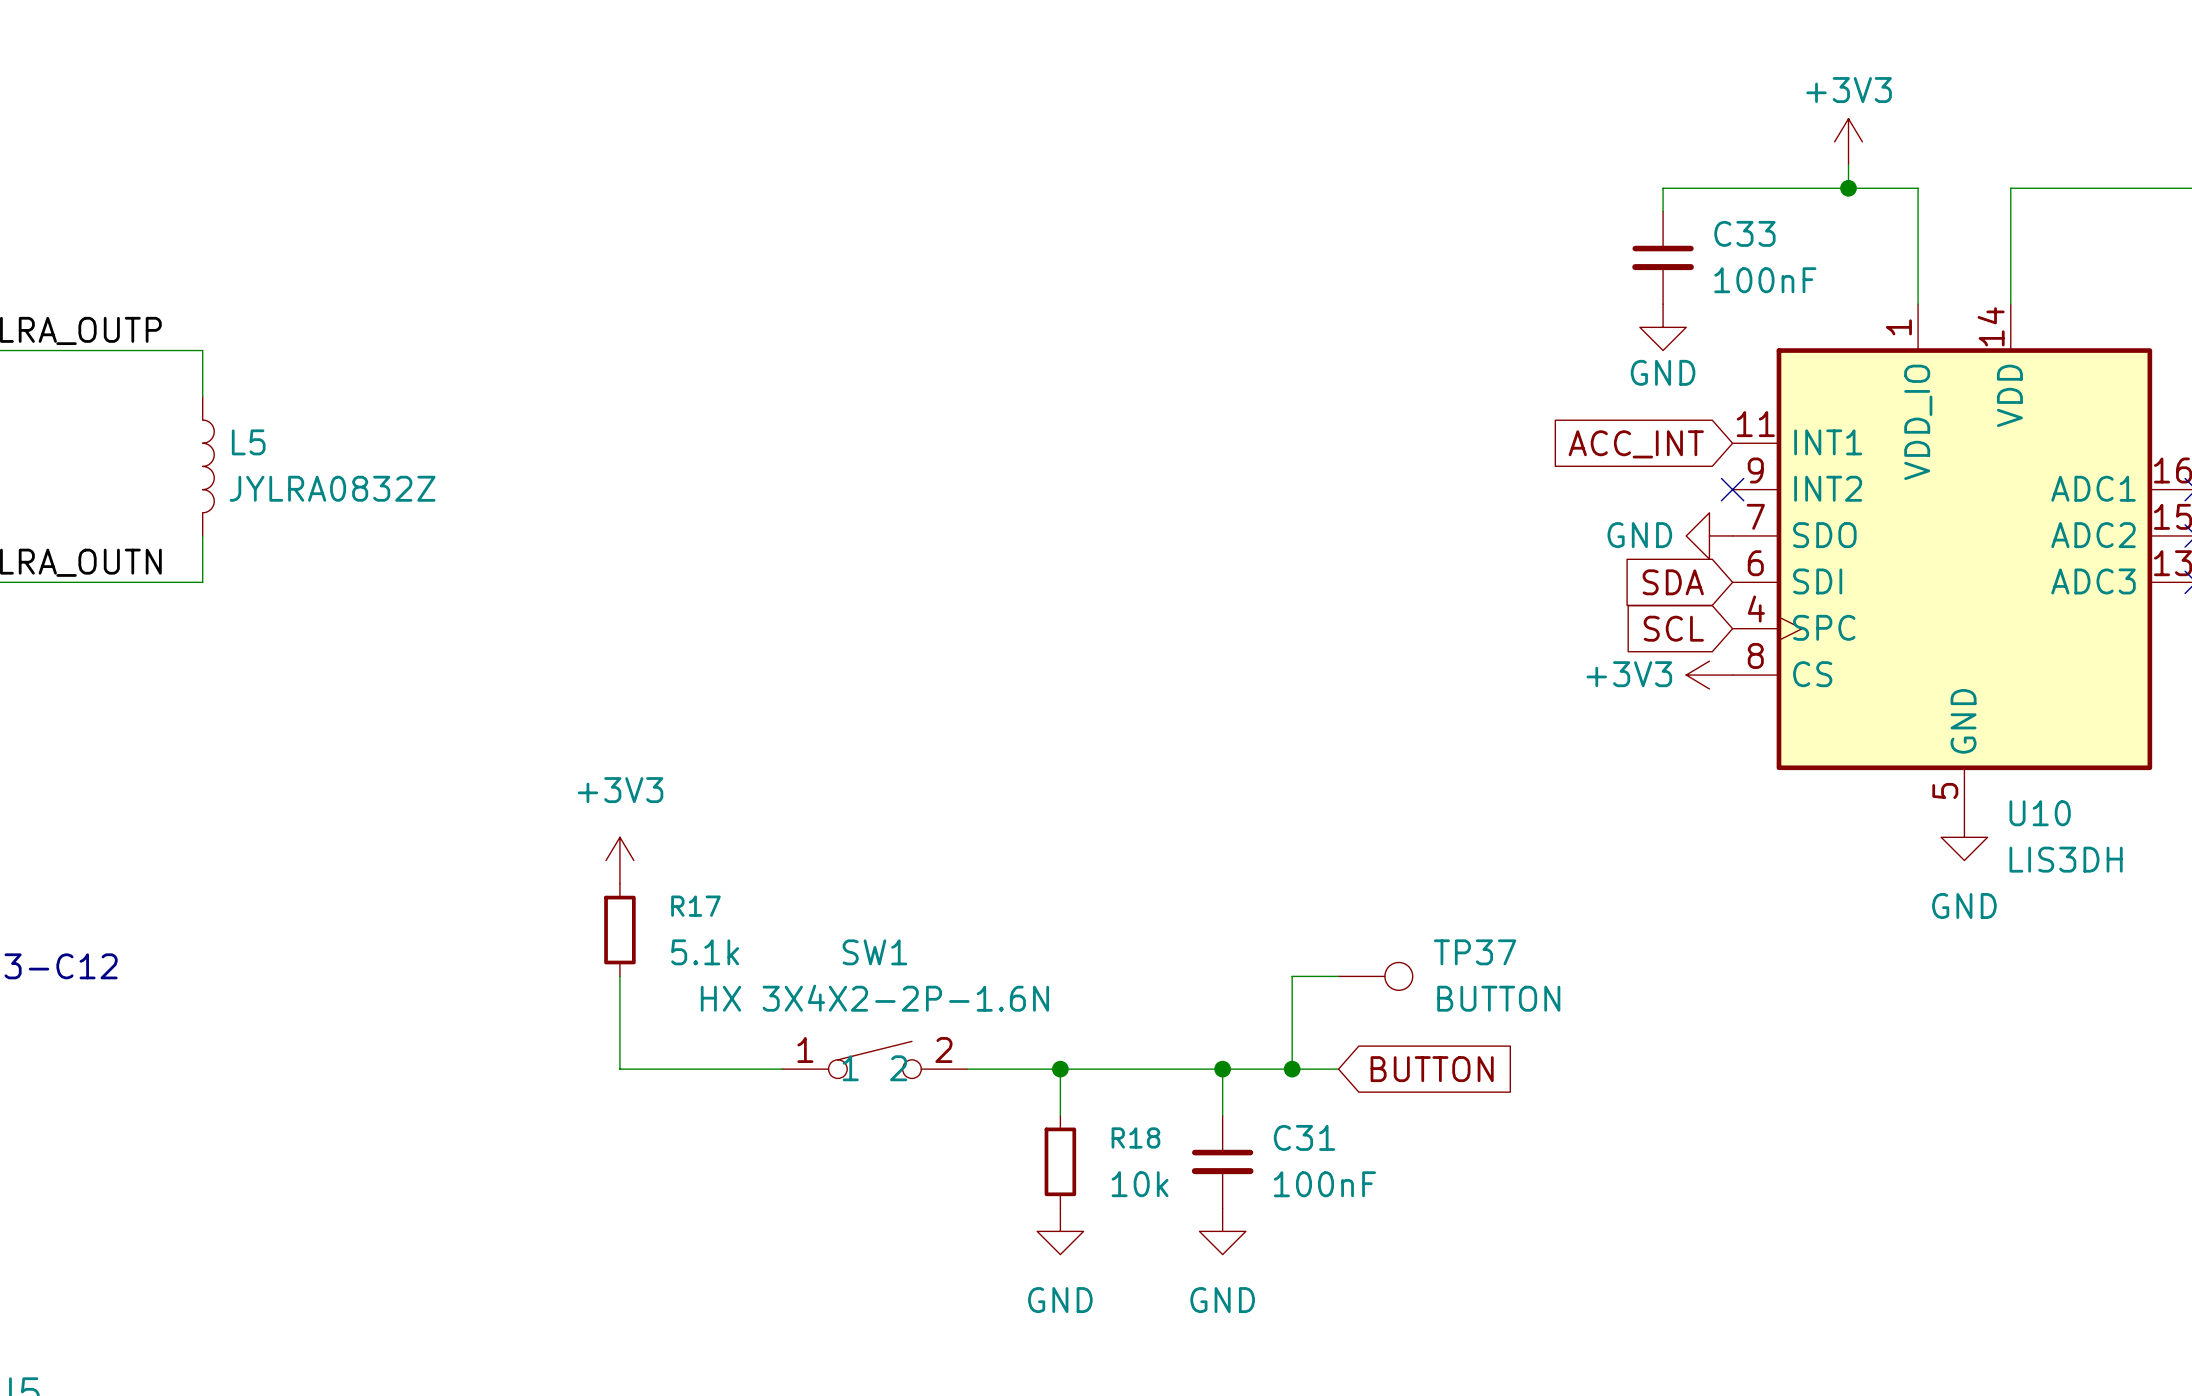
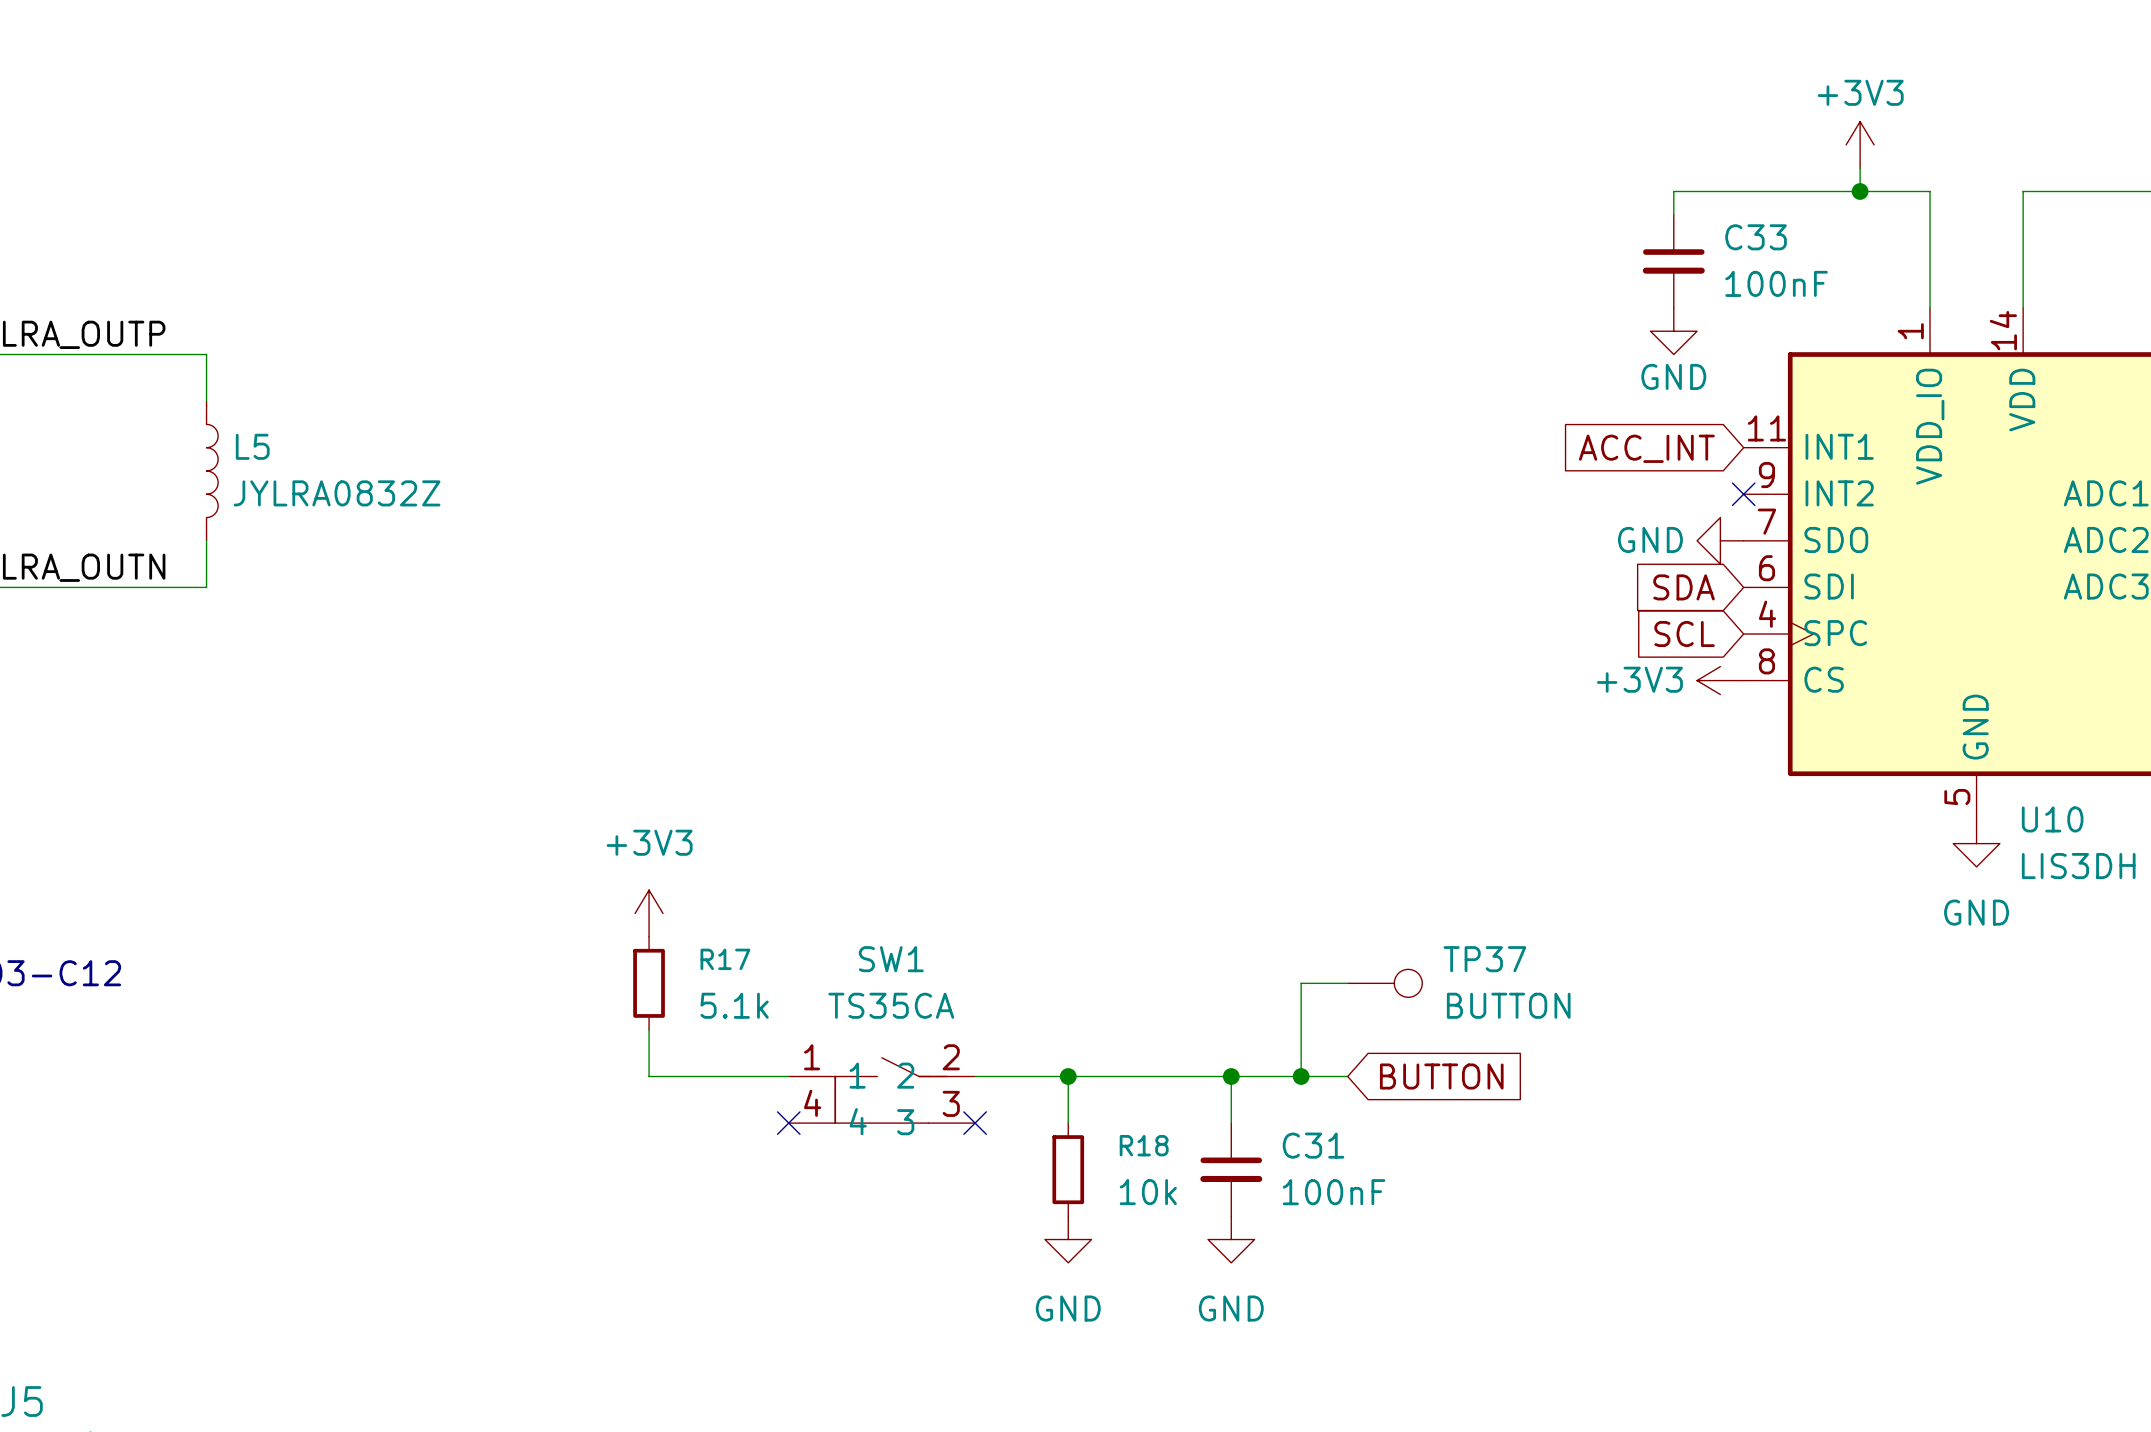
power symbol position: +3V3 (619, 860) -> +3V3 (649, 913)
R17 position: (619, 930) -> (649, 983)
wire: (619, 976) (619, 1069) (643, 1069) -> (649, 1029) (649, 1076)
SW1 value: HX 3X4X2-2P-1.6N (874, 998) -> TS35CA (891, 1005)
SW1 symbol: [782, 1041, 968, 1079] -> [788, 1057, 976, 1124]
no-connect mark: none -> (788, 1123)
no-connect mark: none -> (975, 1123)

